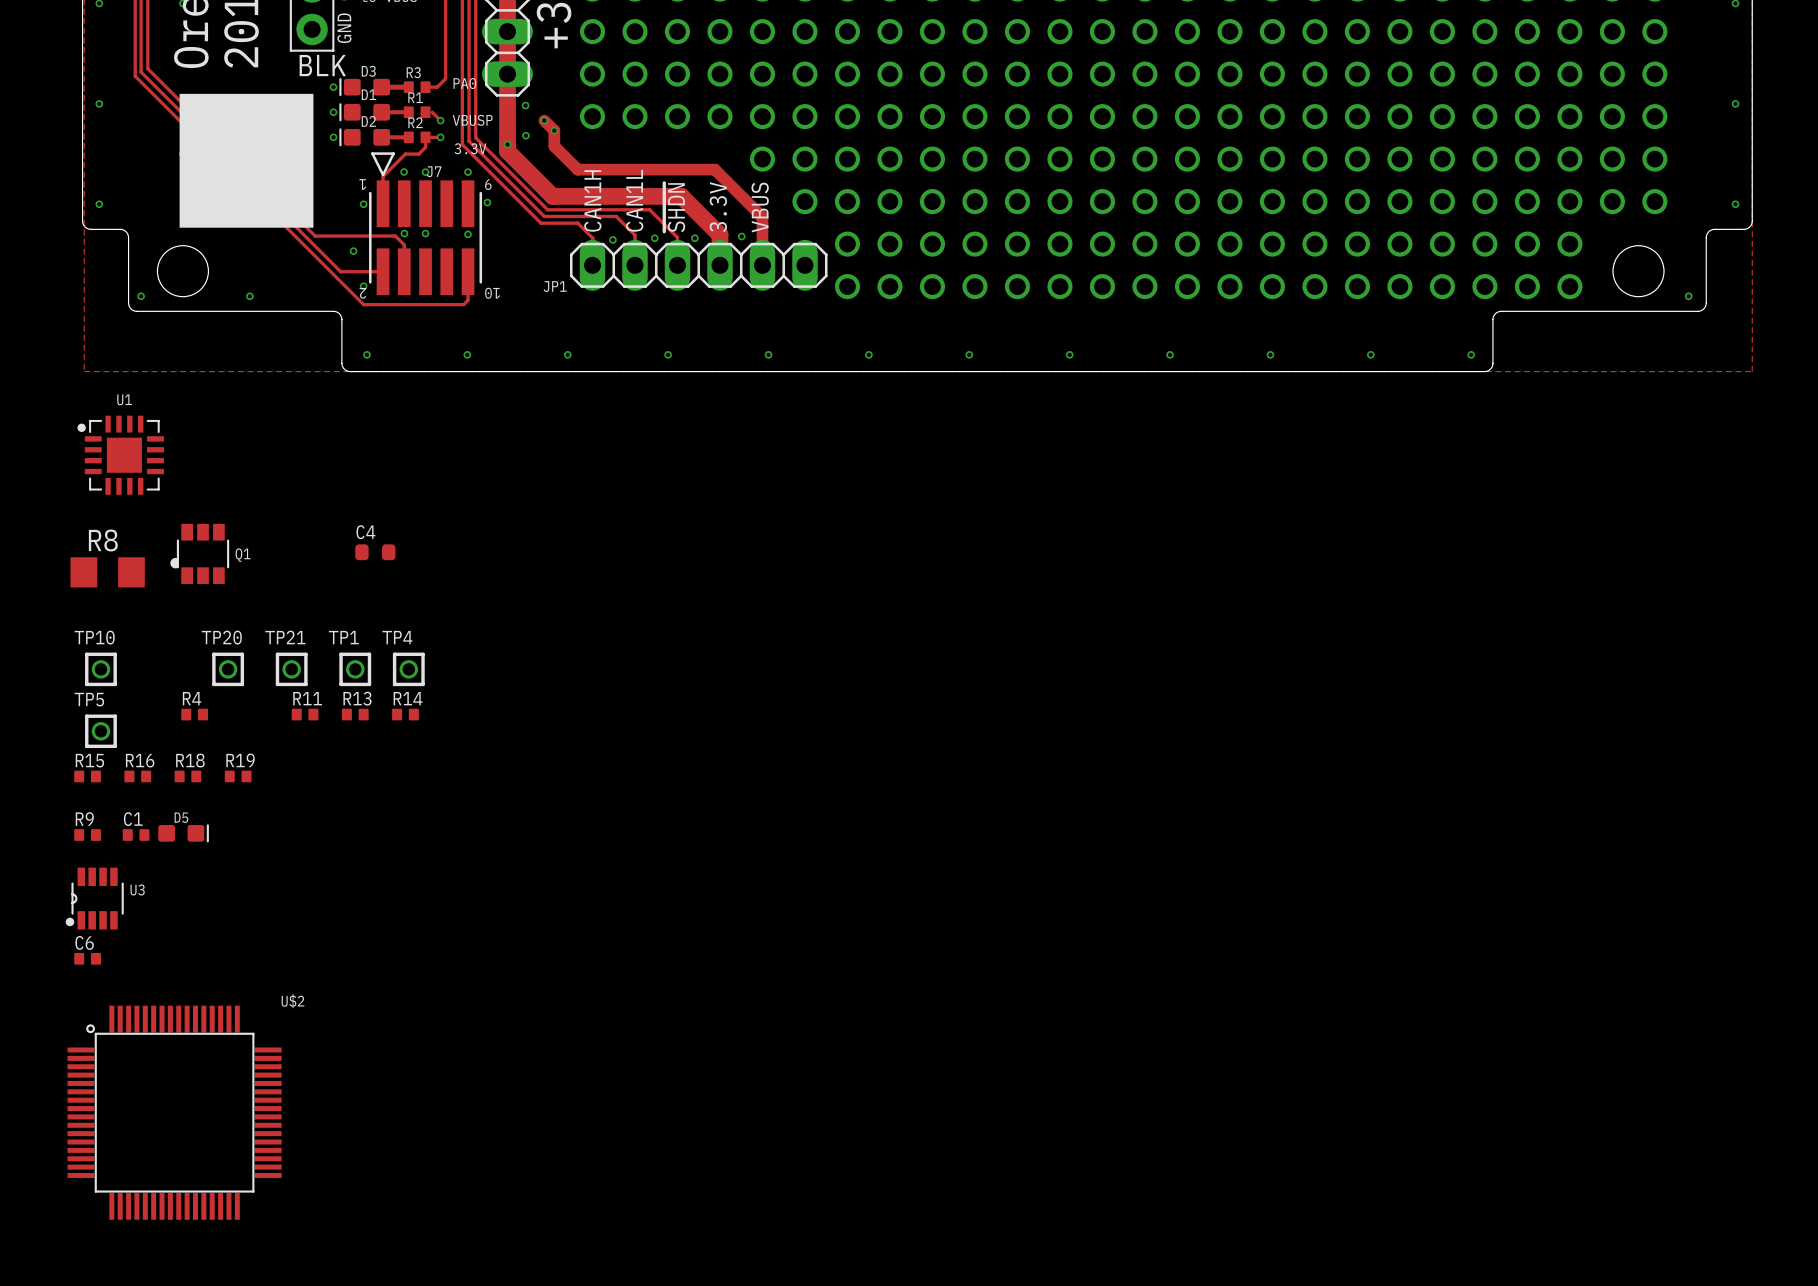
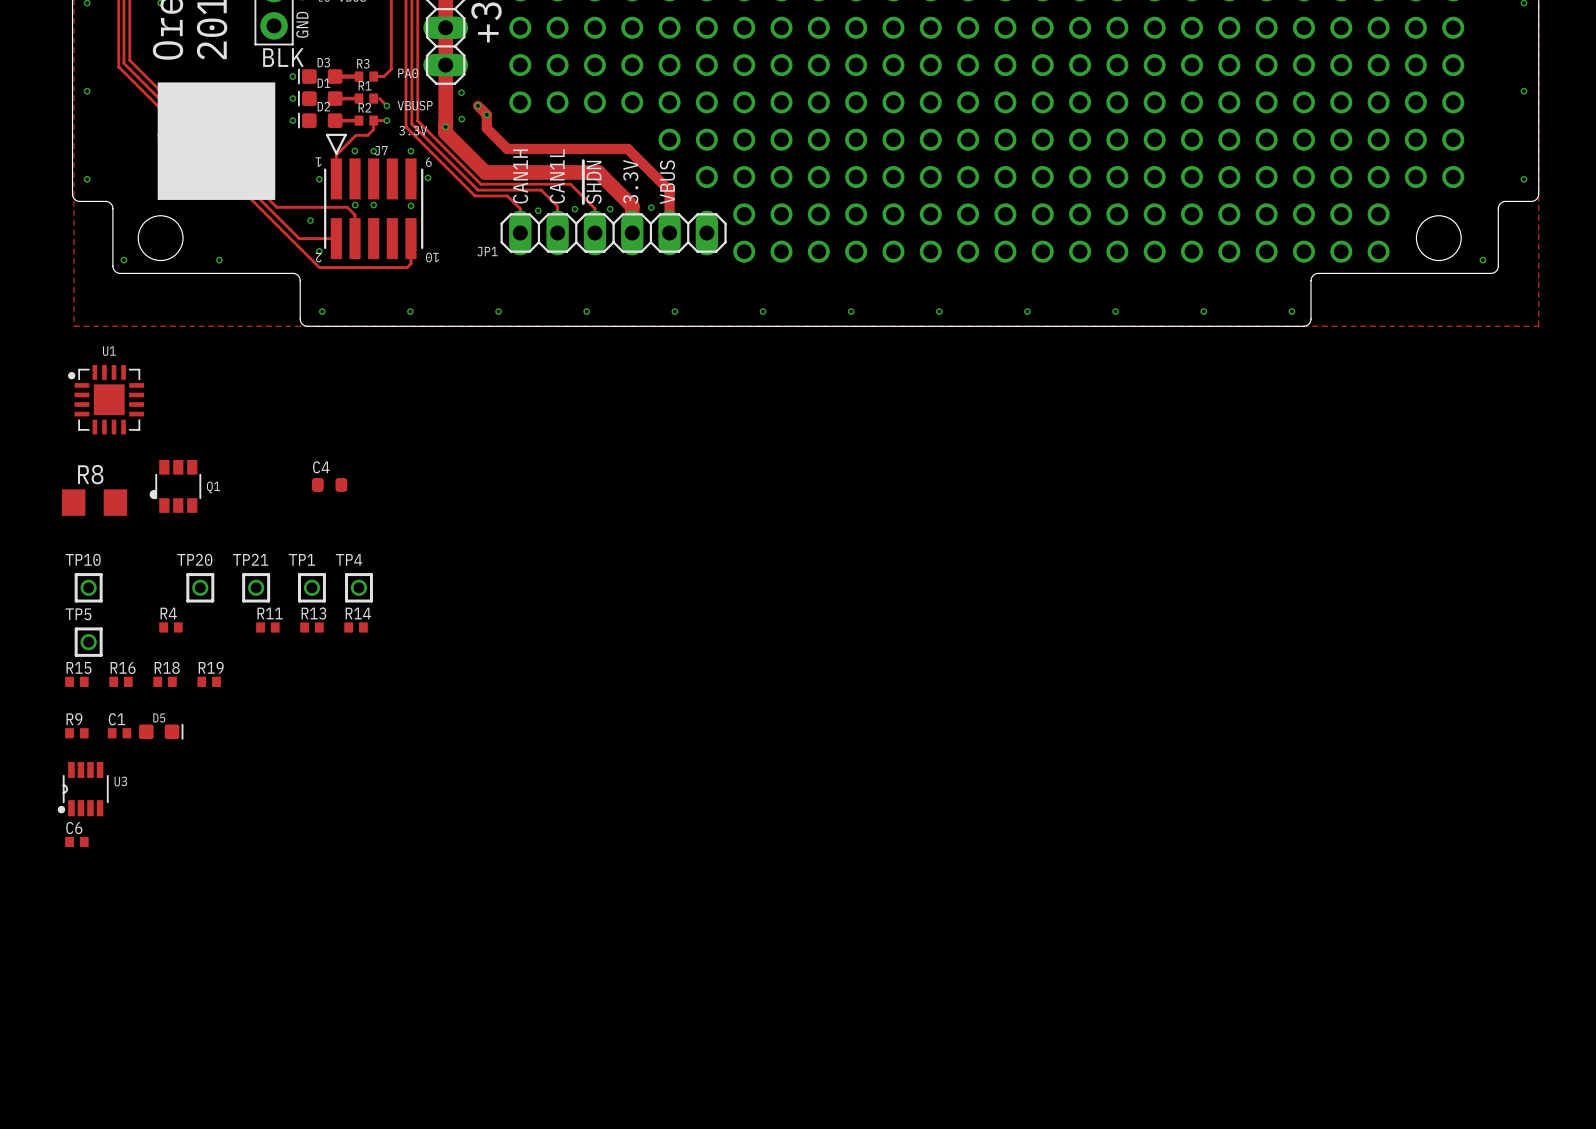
U$2: (174, 1112) -> none

